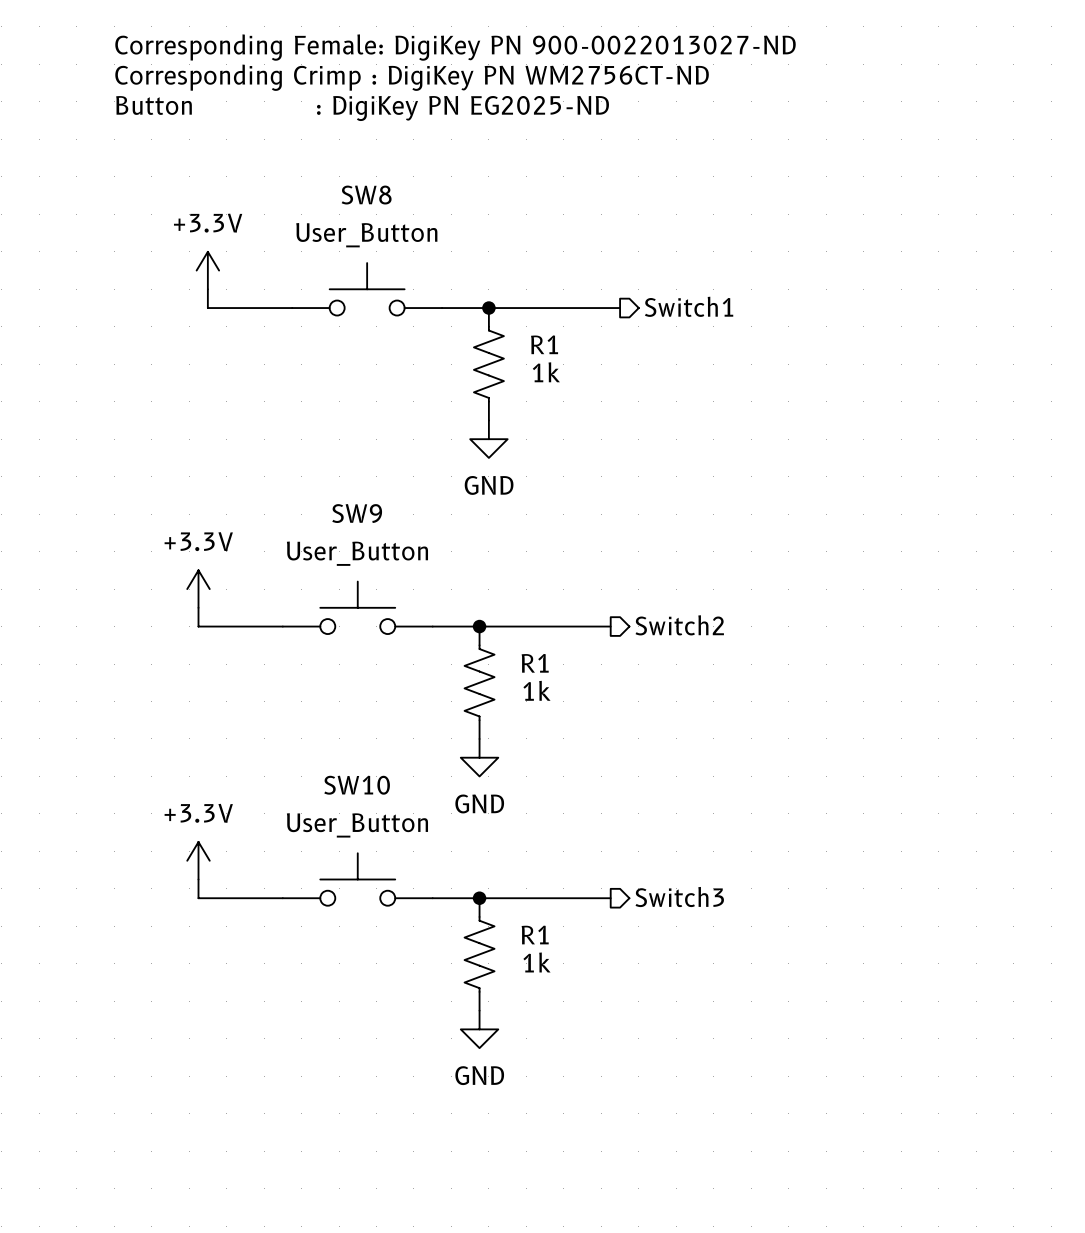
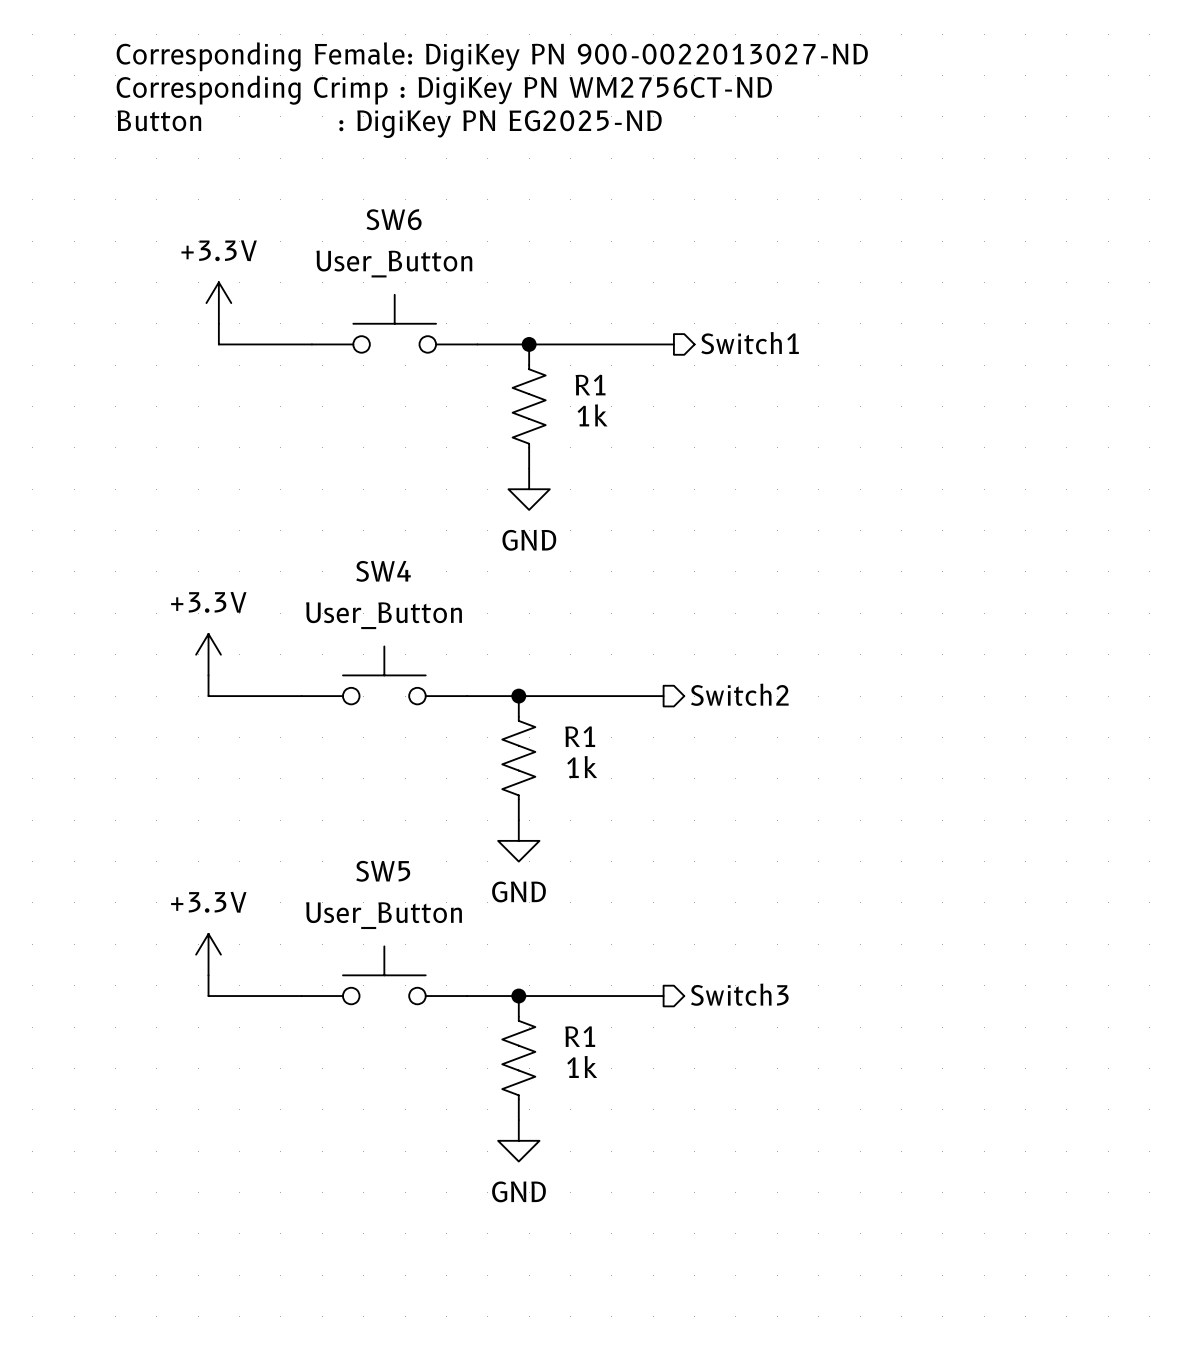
SW8 name: SW8 (366, 195) -> SW6 (394, 219)
SW9 name: SW9 (357, 513) -> SW4 (383, 571)
SW10 name: SW10 (357, 785) -> SW5 (383, 871)

